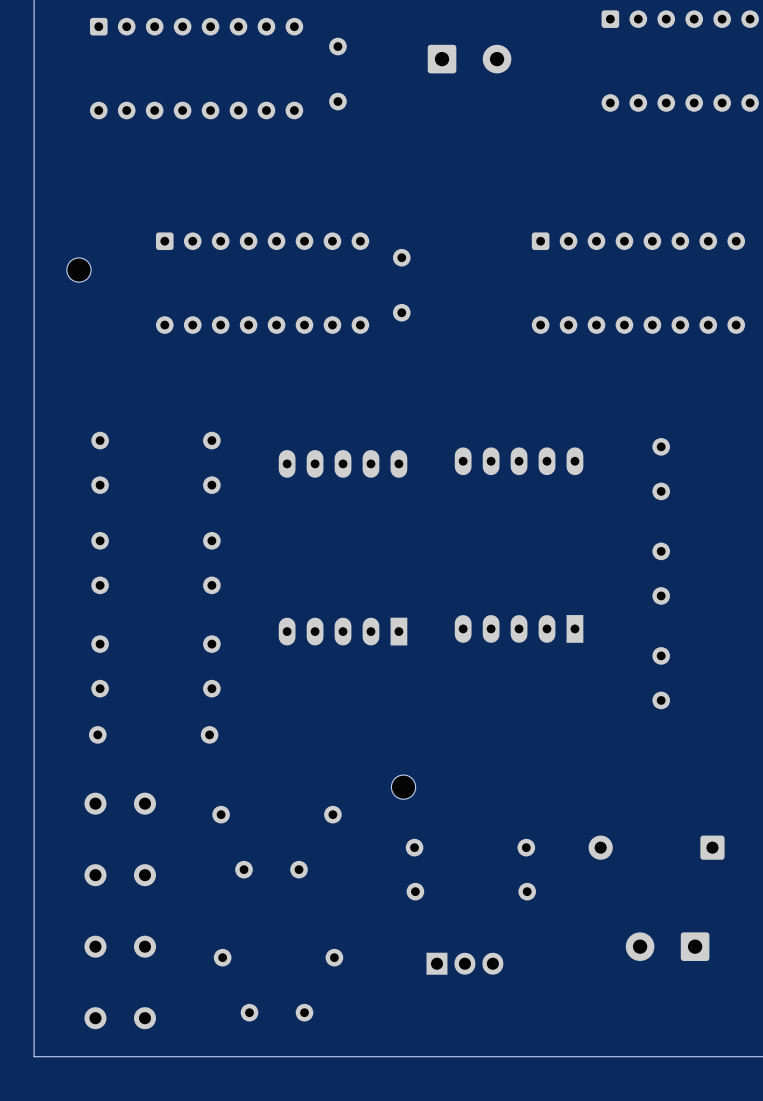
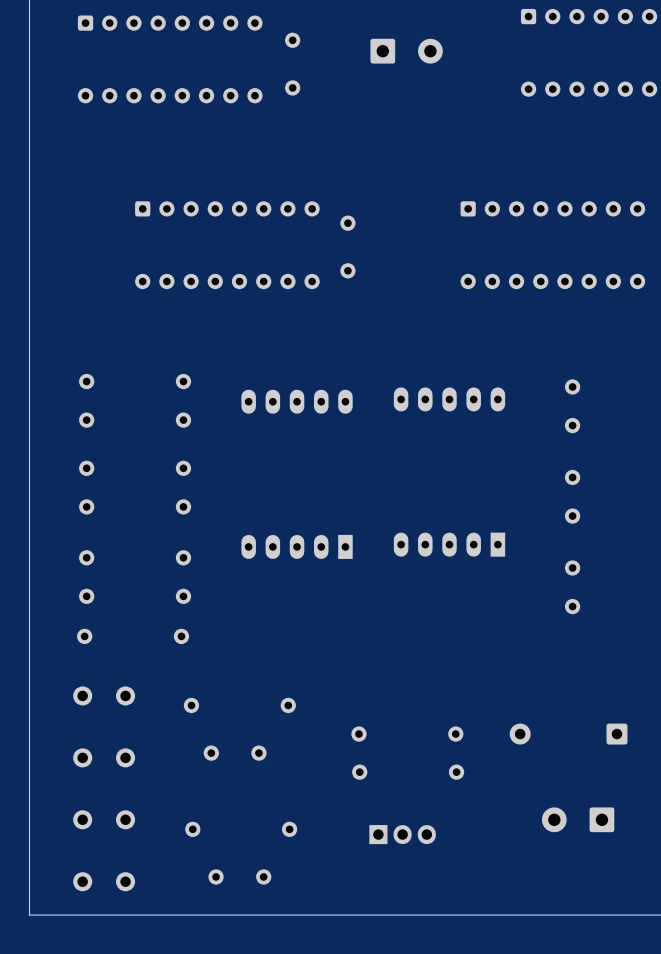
part: (78, 270) -> none
part: (403, 787) -> none

